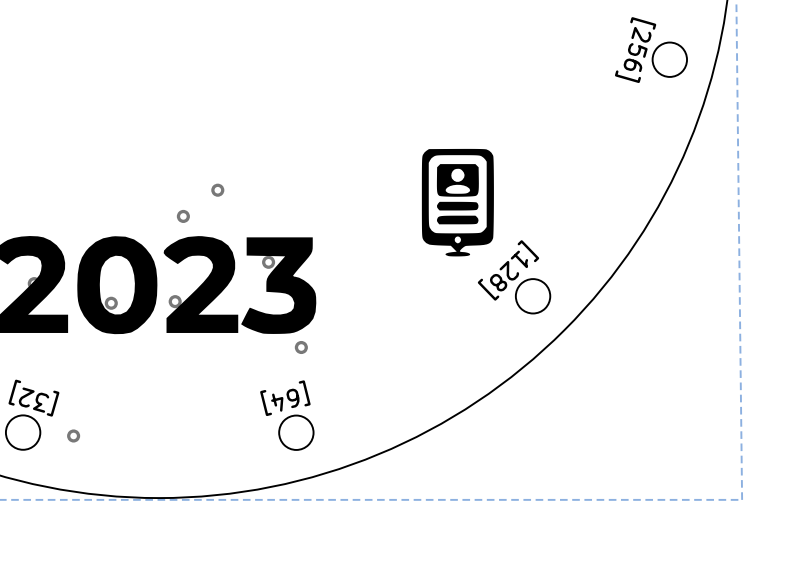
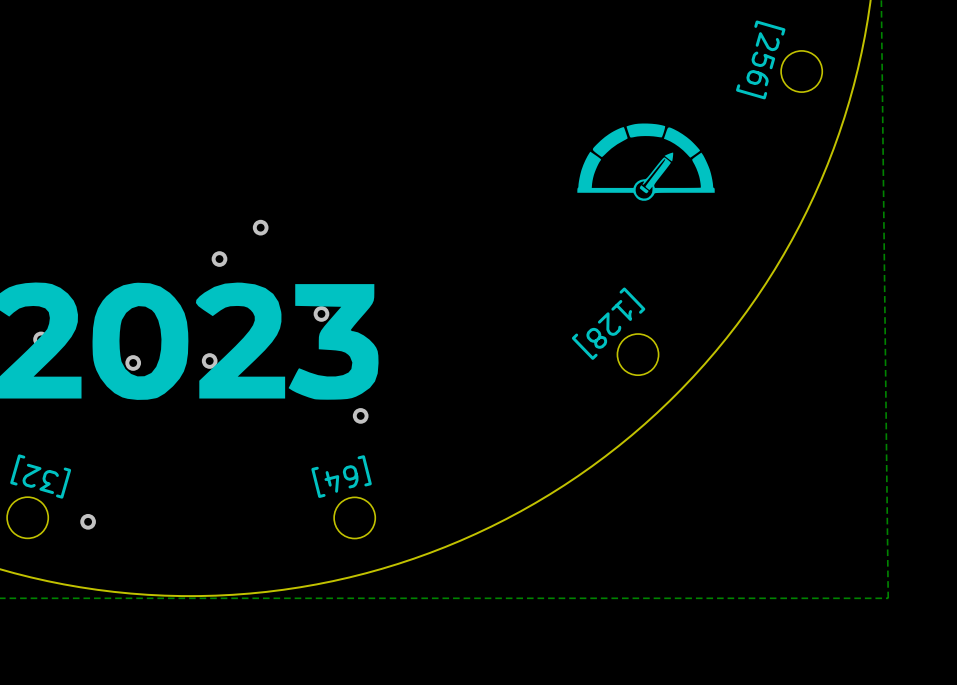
drawing: none -> [577, 123, 715, 201]
drawing: [421, 148, 494, 257] -> none

